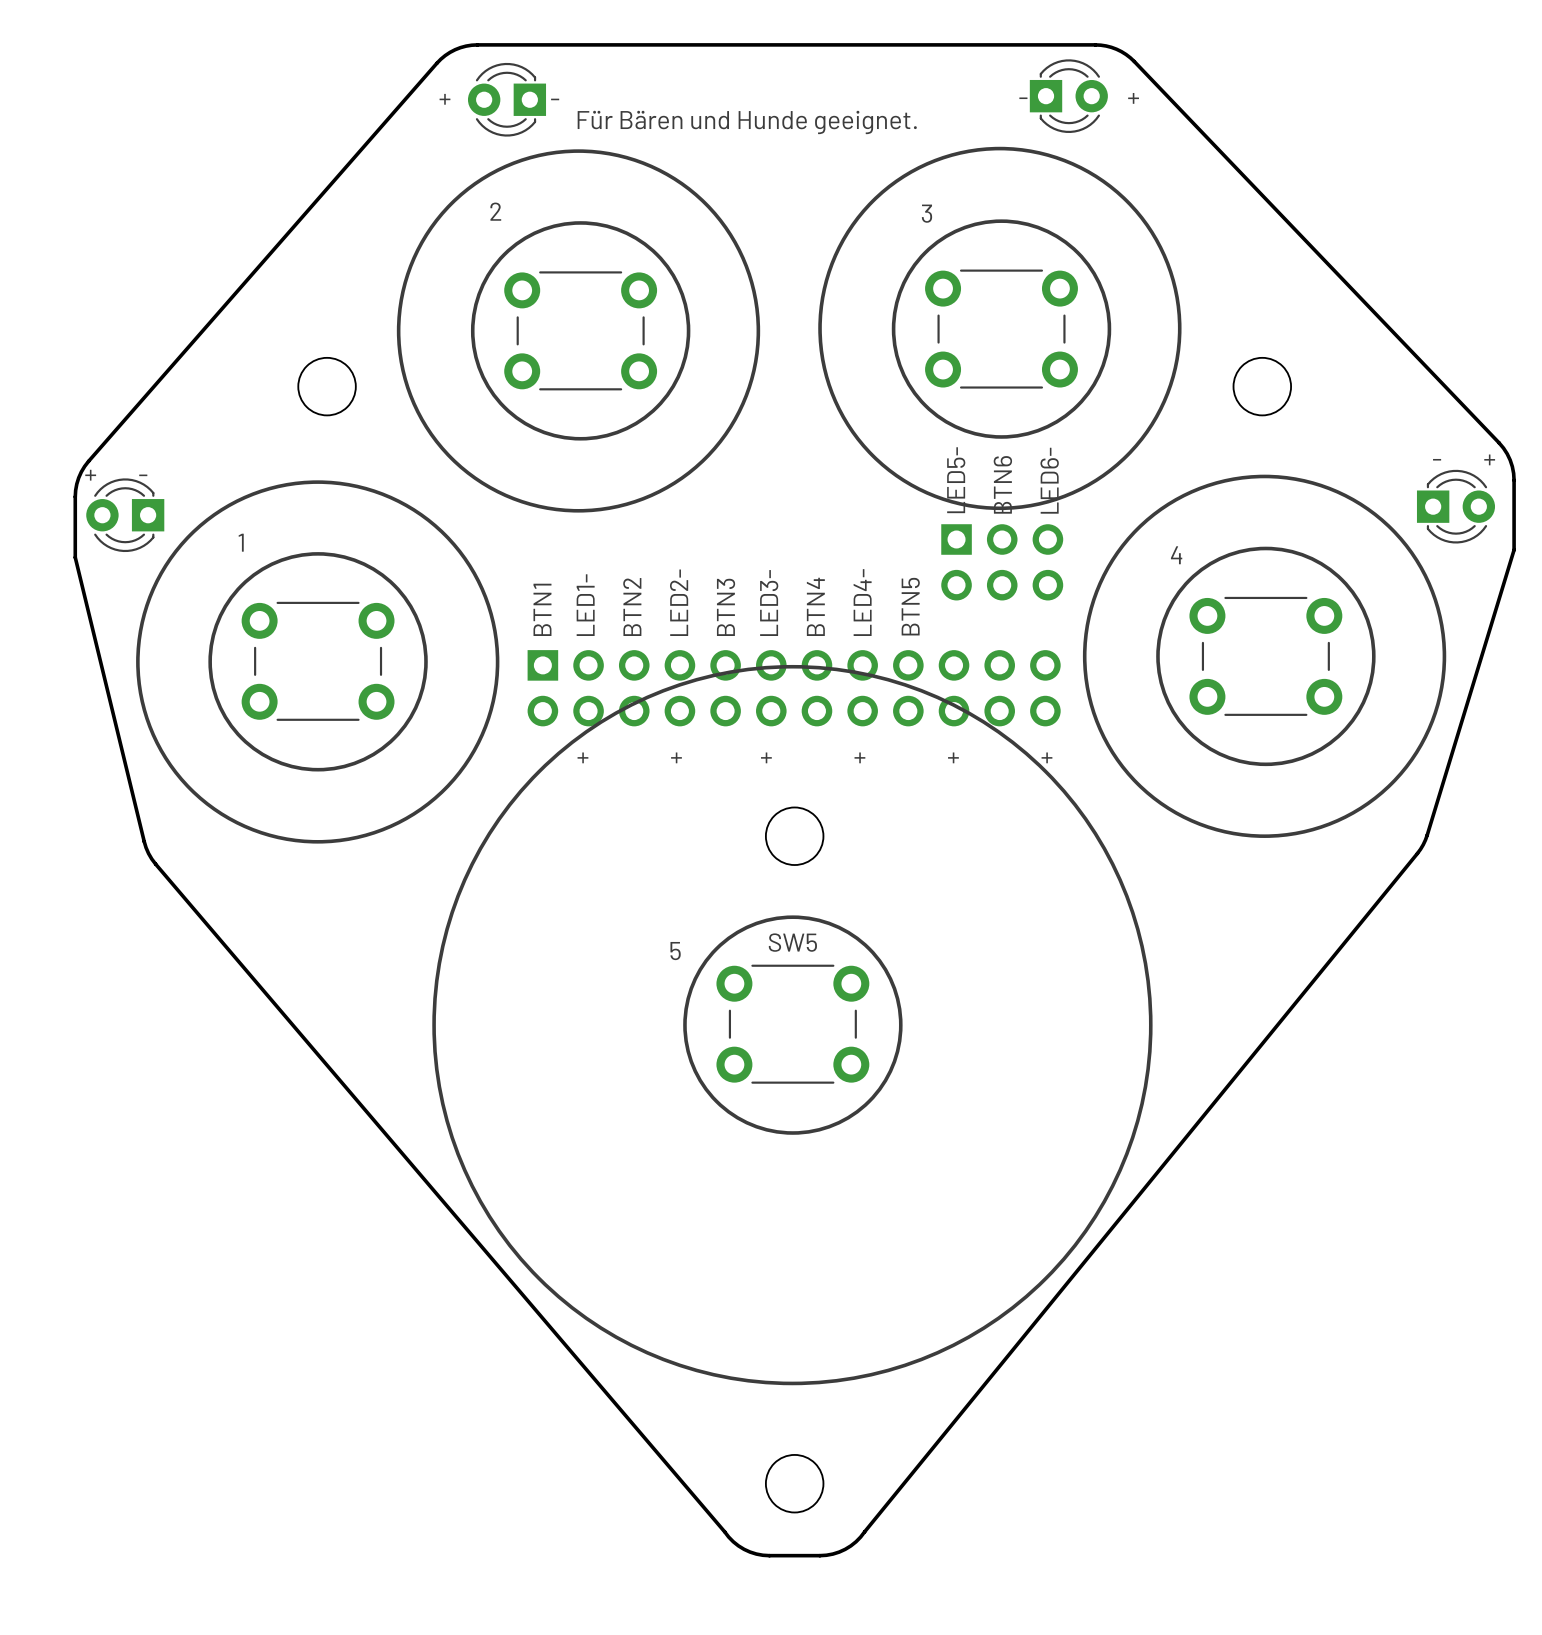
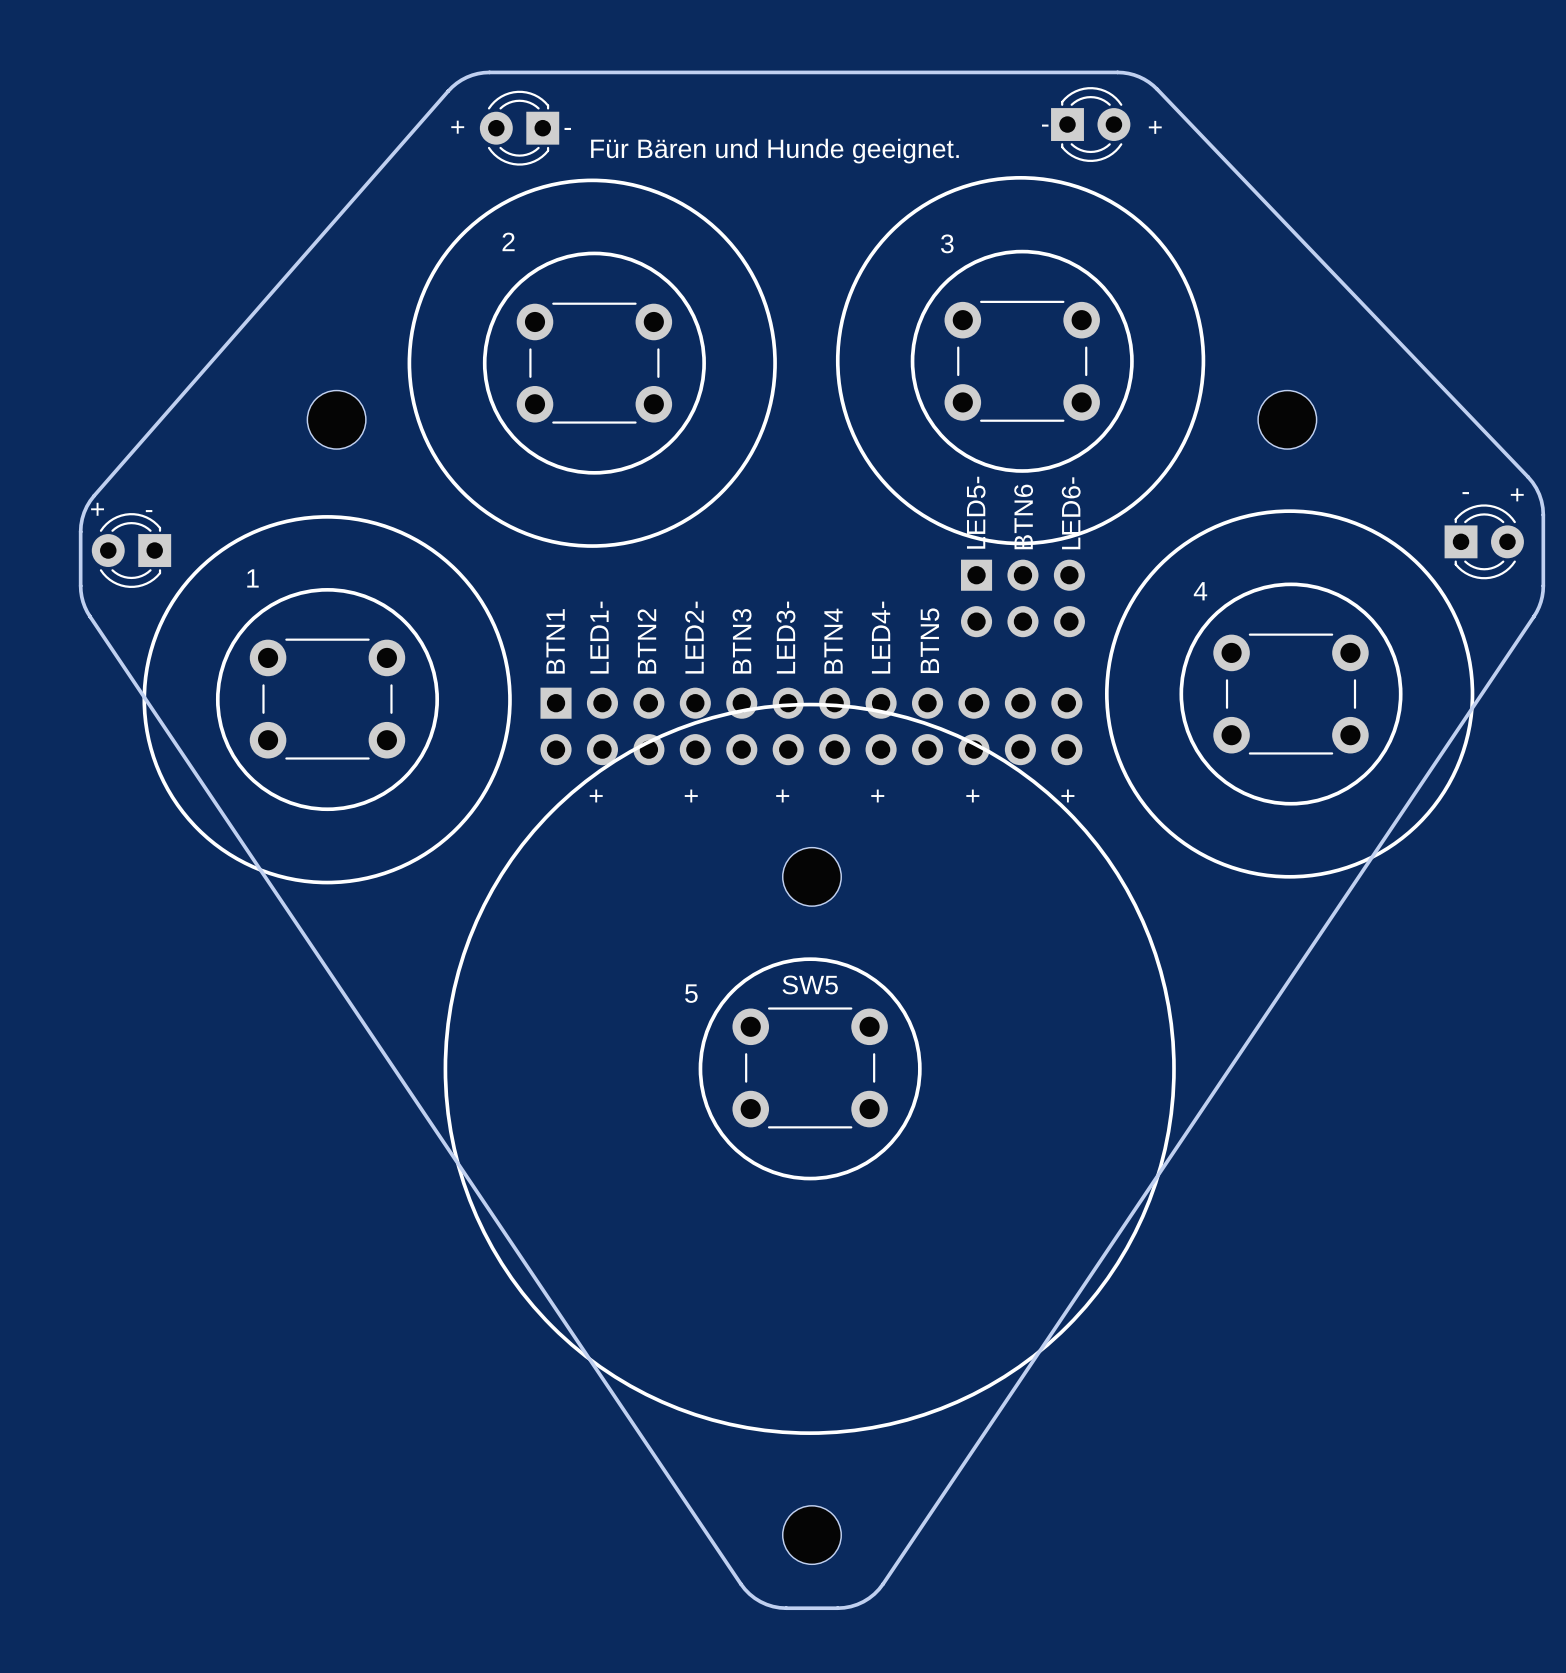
board edge: (75, 550) (75, 557) (144, 841) (151, 859) (724, 1531) -> (80, 585) (83, 601) (90, 616) (740, 1583)
board edge: (1514, 550) (1427, 835) (1420, 849) (864, 1531) -> (1543, 585) (1540, 601) (1533, 616) (883, 1583)

